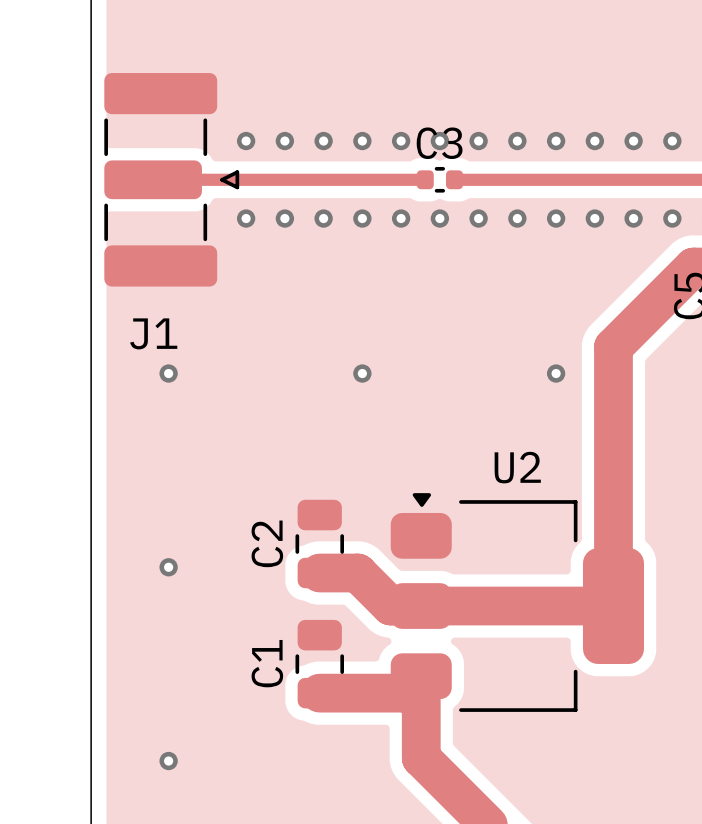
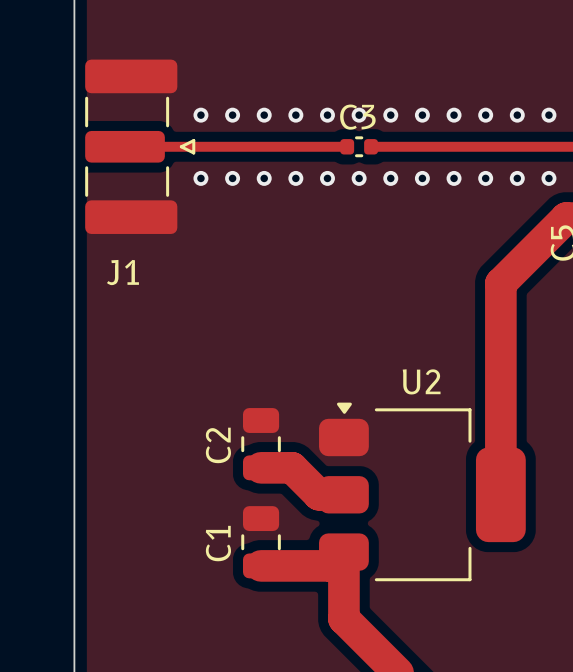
via: (168, 373) -> none
via: (362, 373) -> none
via: (556, 373) -> none
via: (168, 567) -> none
track: (421, 606) (613, 606) -> none
via: (168, 761) -> none

